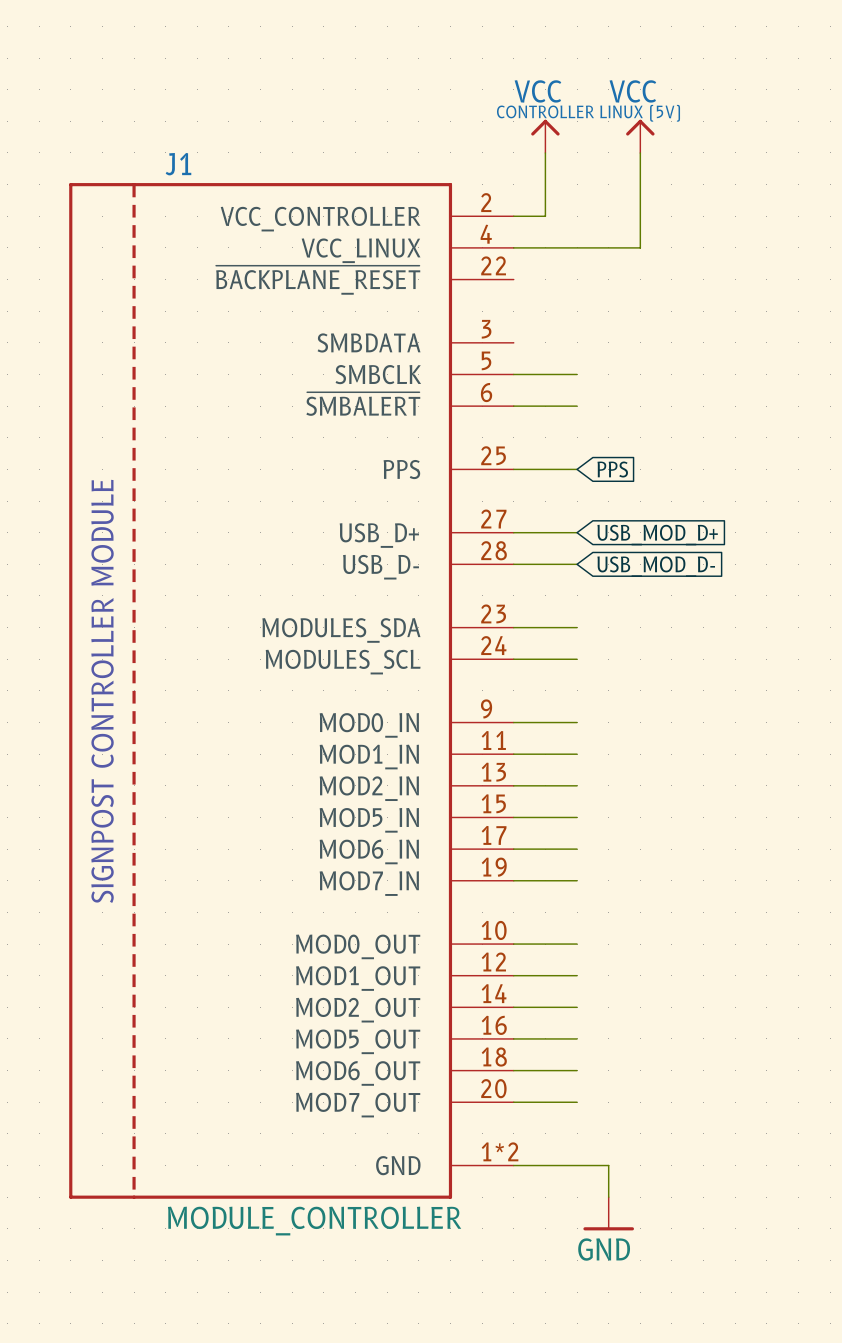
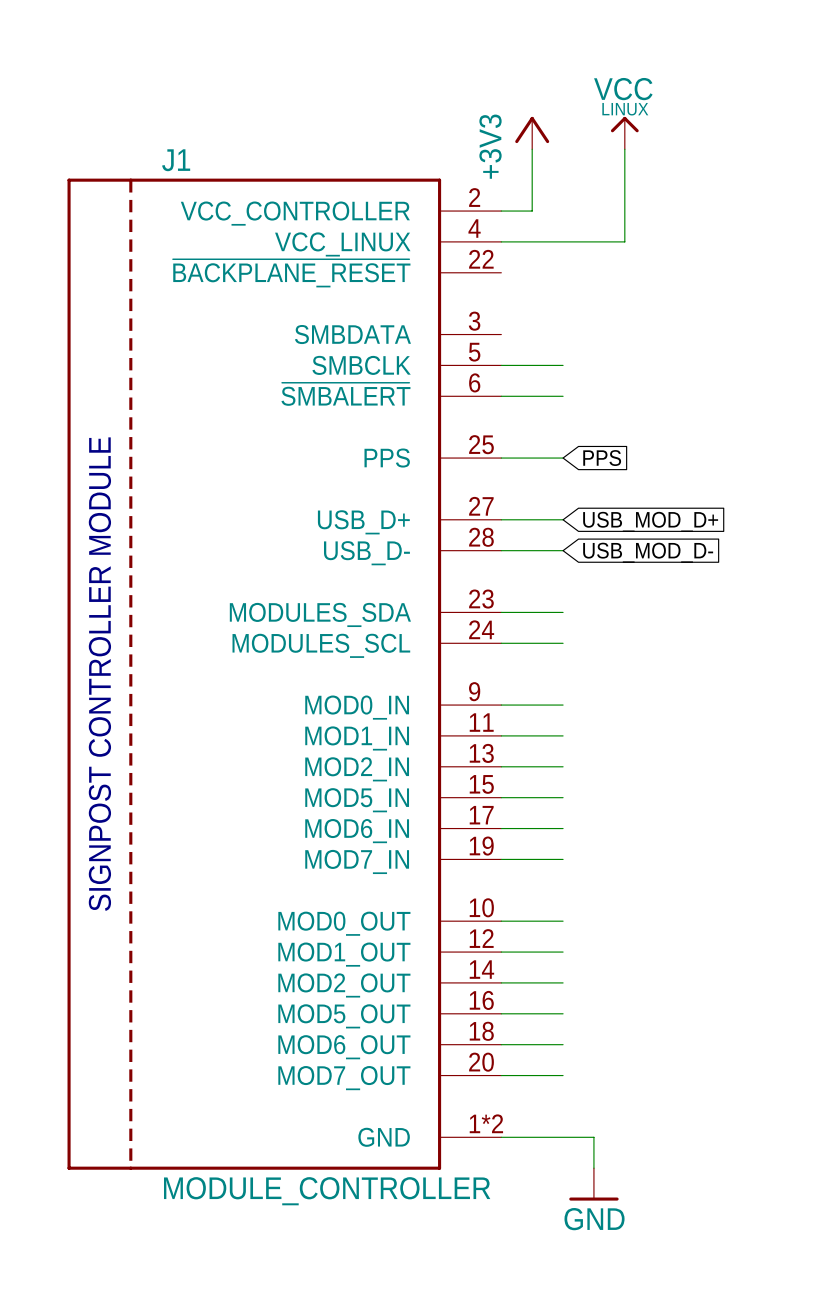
power symbol text: LINUX (5V) (640, 113) -> LINUX (625, 109)
power symbol shape: [531, 119, 560, 153] -> [515, 116, 550, 150]
power symbol text: none -> +3V3 (490, 146)

